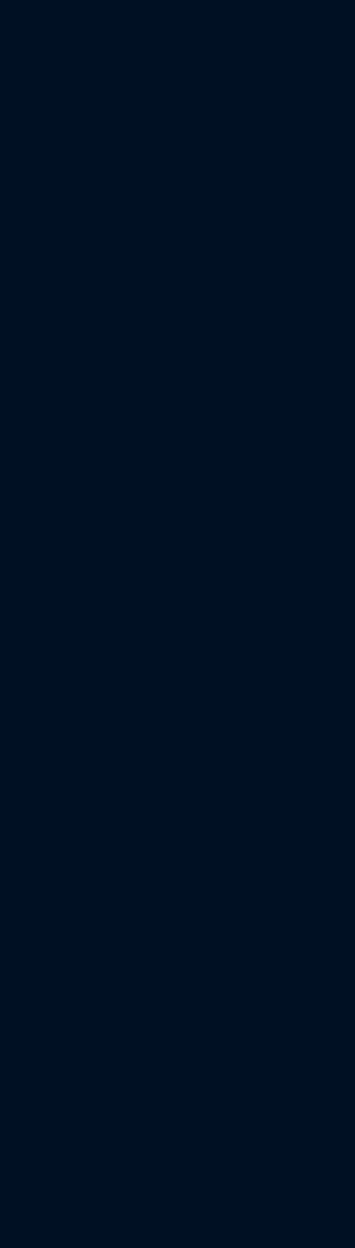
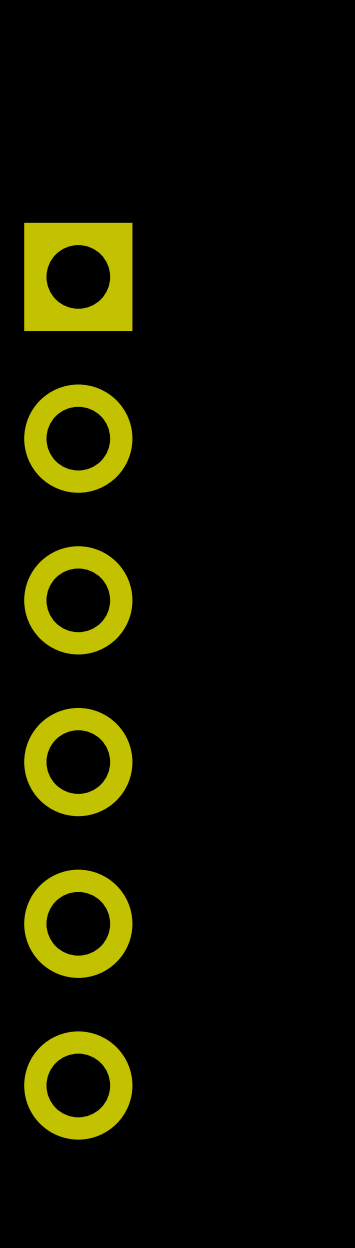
part: none -> (78, 681)

